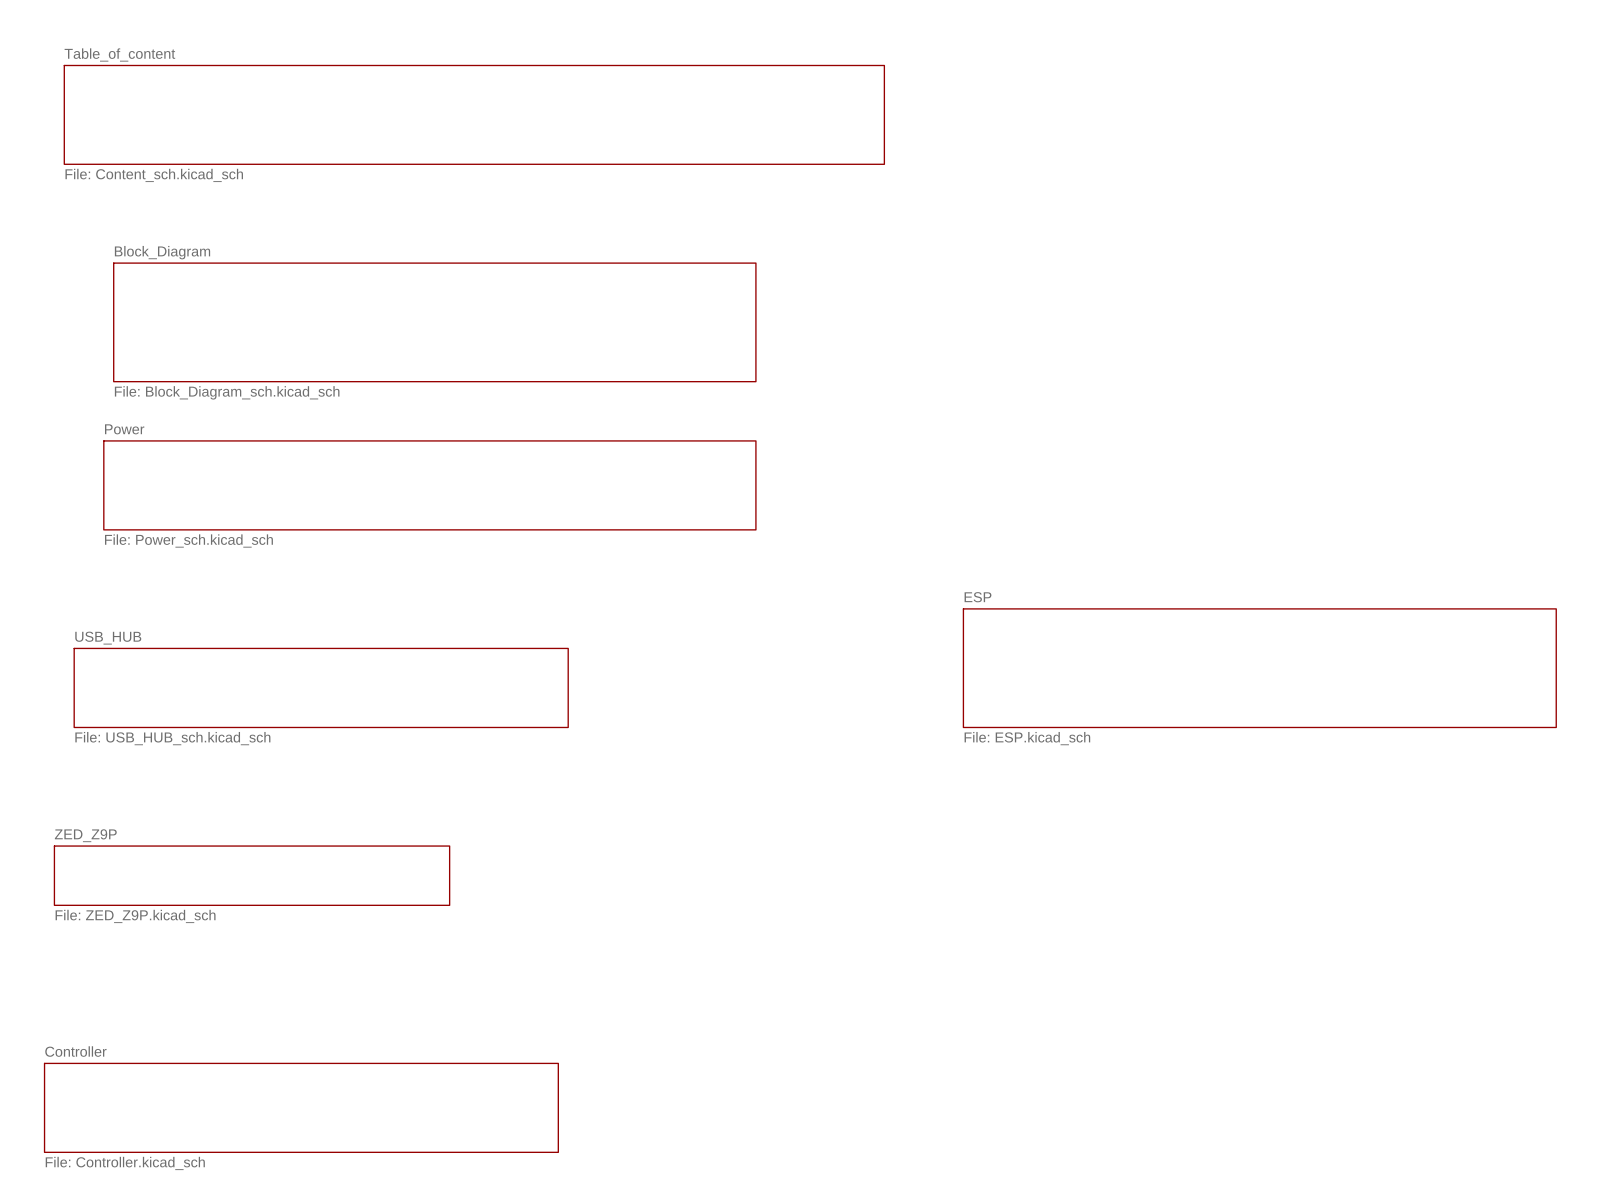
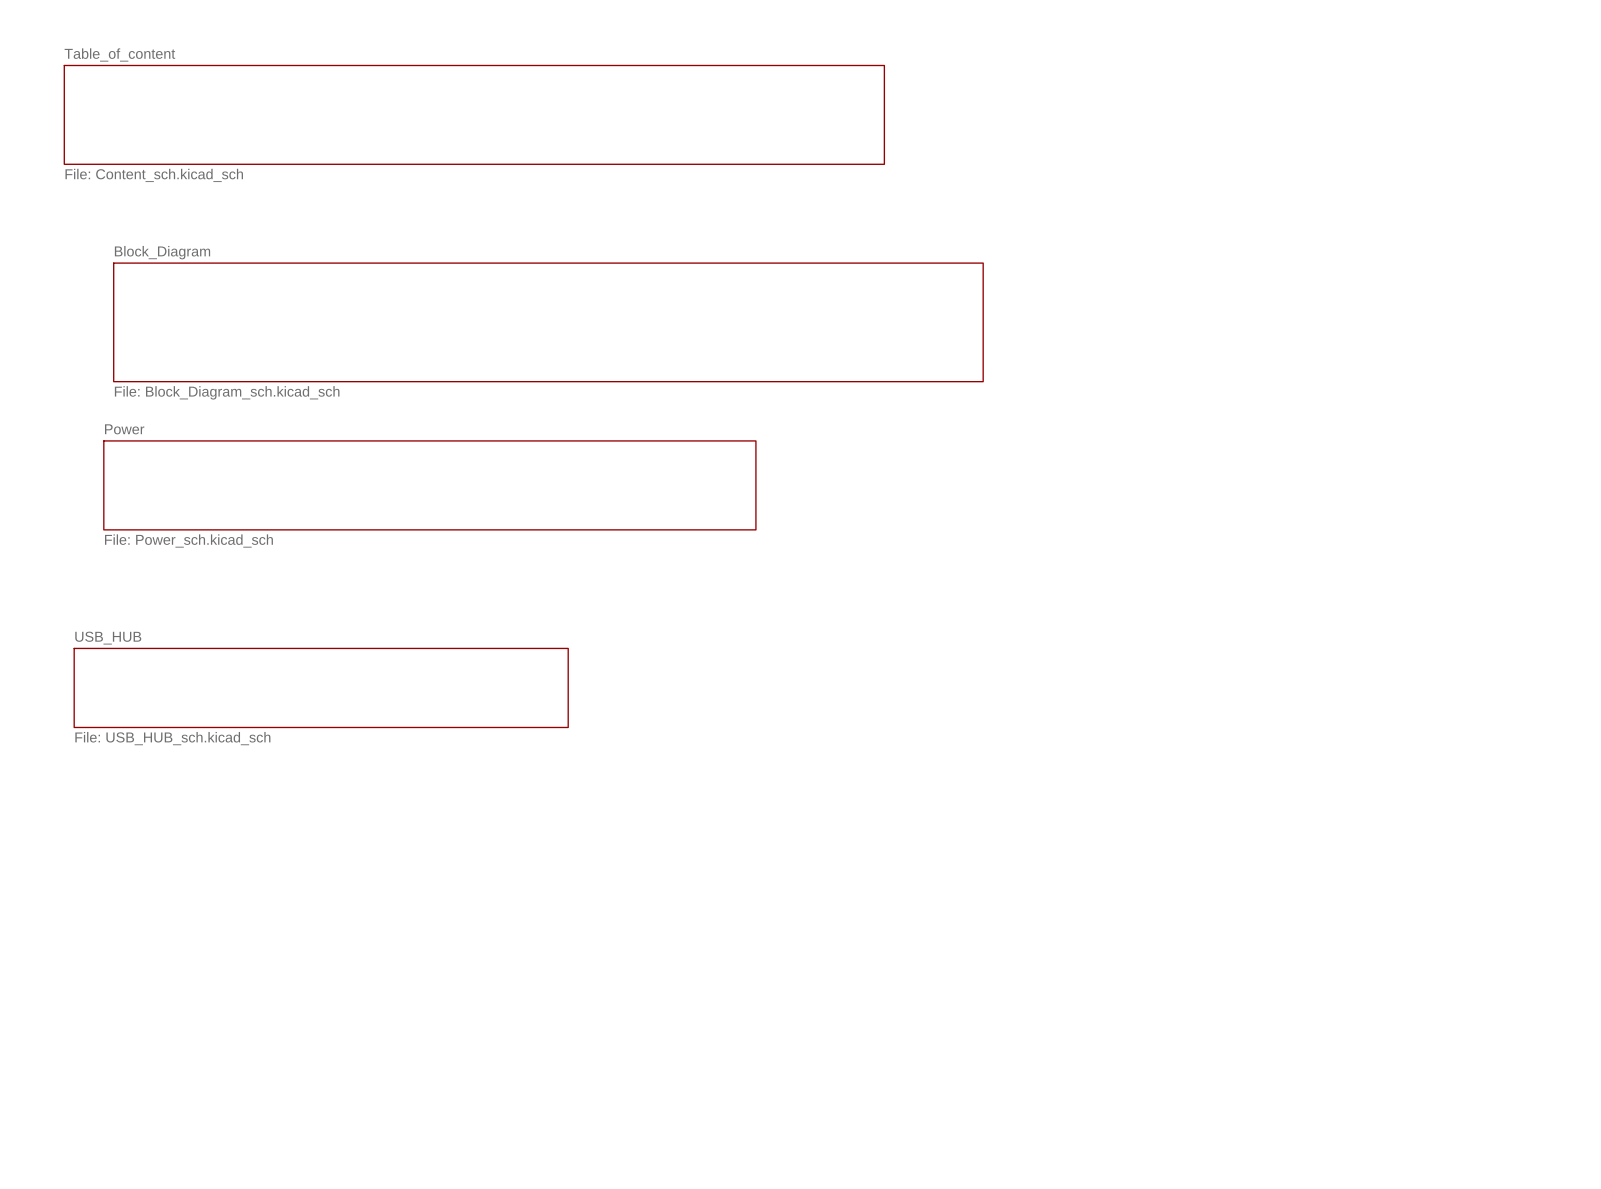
sheet Block_Diagram: File: Block_Diagram_sch.kicad_sch (434, 322) -> none
sheet Block_Diagram: none -> File: Block_Diagram_sch.kicad_sch (548, 322)
sheet ESP: File: ESP.kicad_sch (1259, 668) -> none
sheet ZED_Z9P: File: ZED_Z9P.kicad_sch (252, 875) -> none
sheet Controller: File: Controller.kicad_sch (301, 1107) -> none

